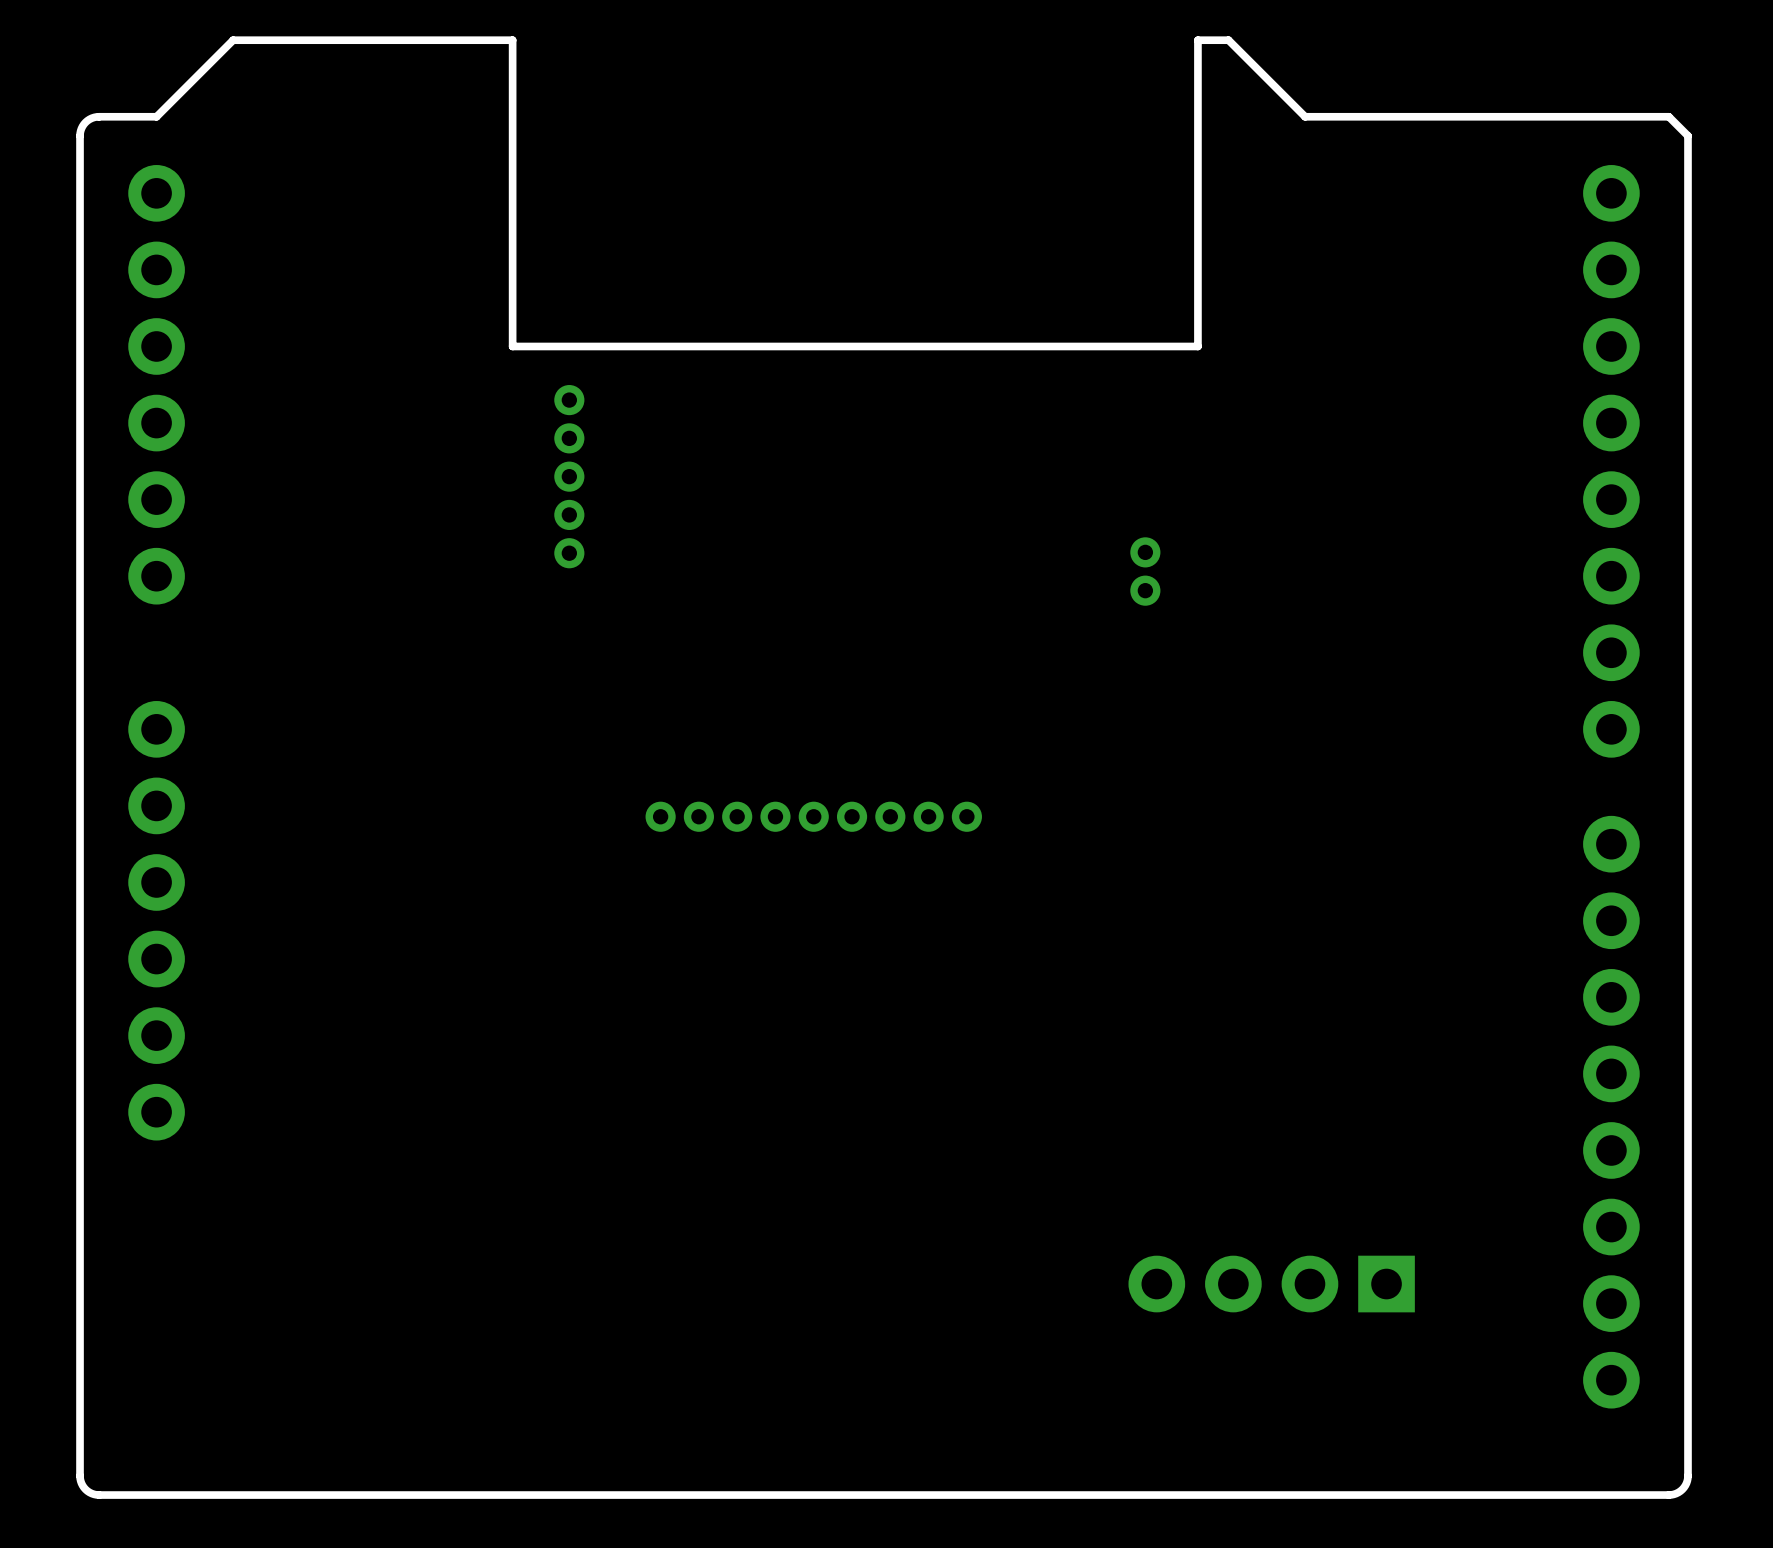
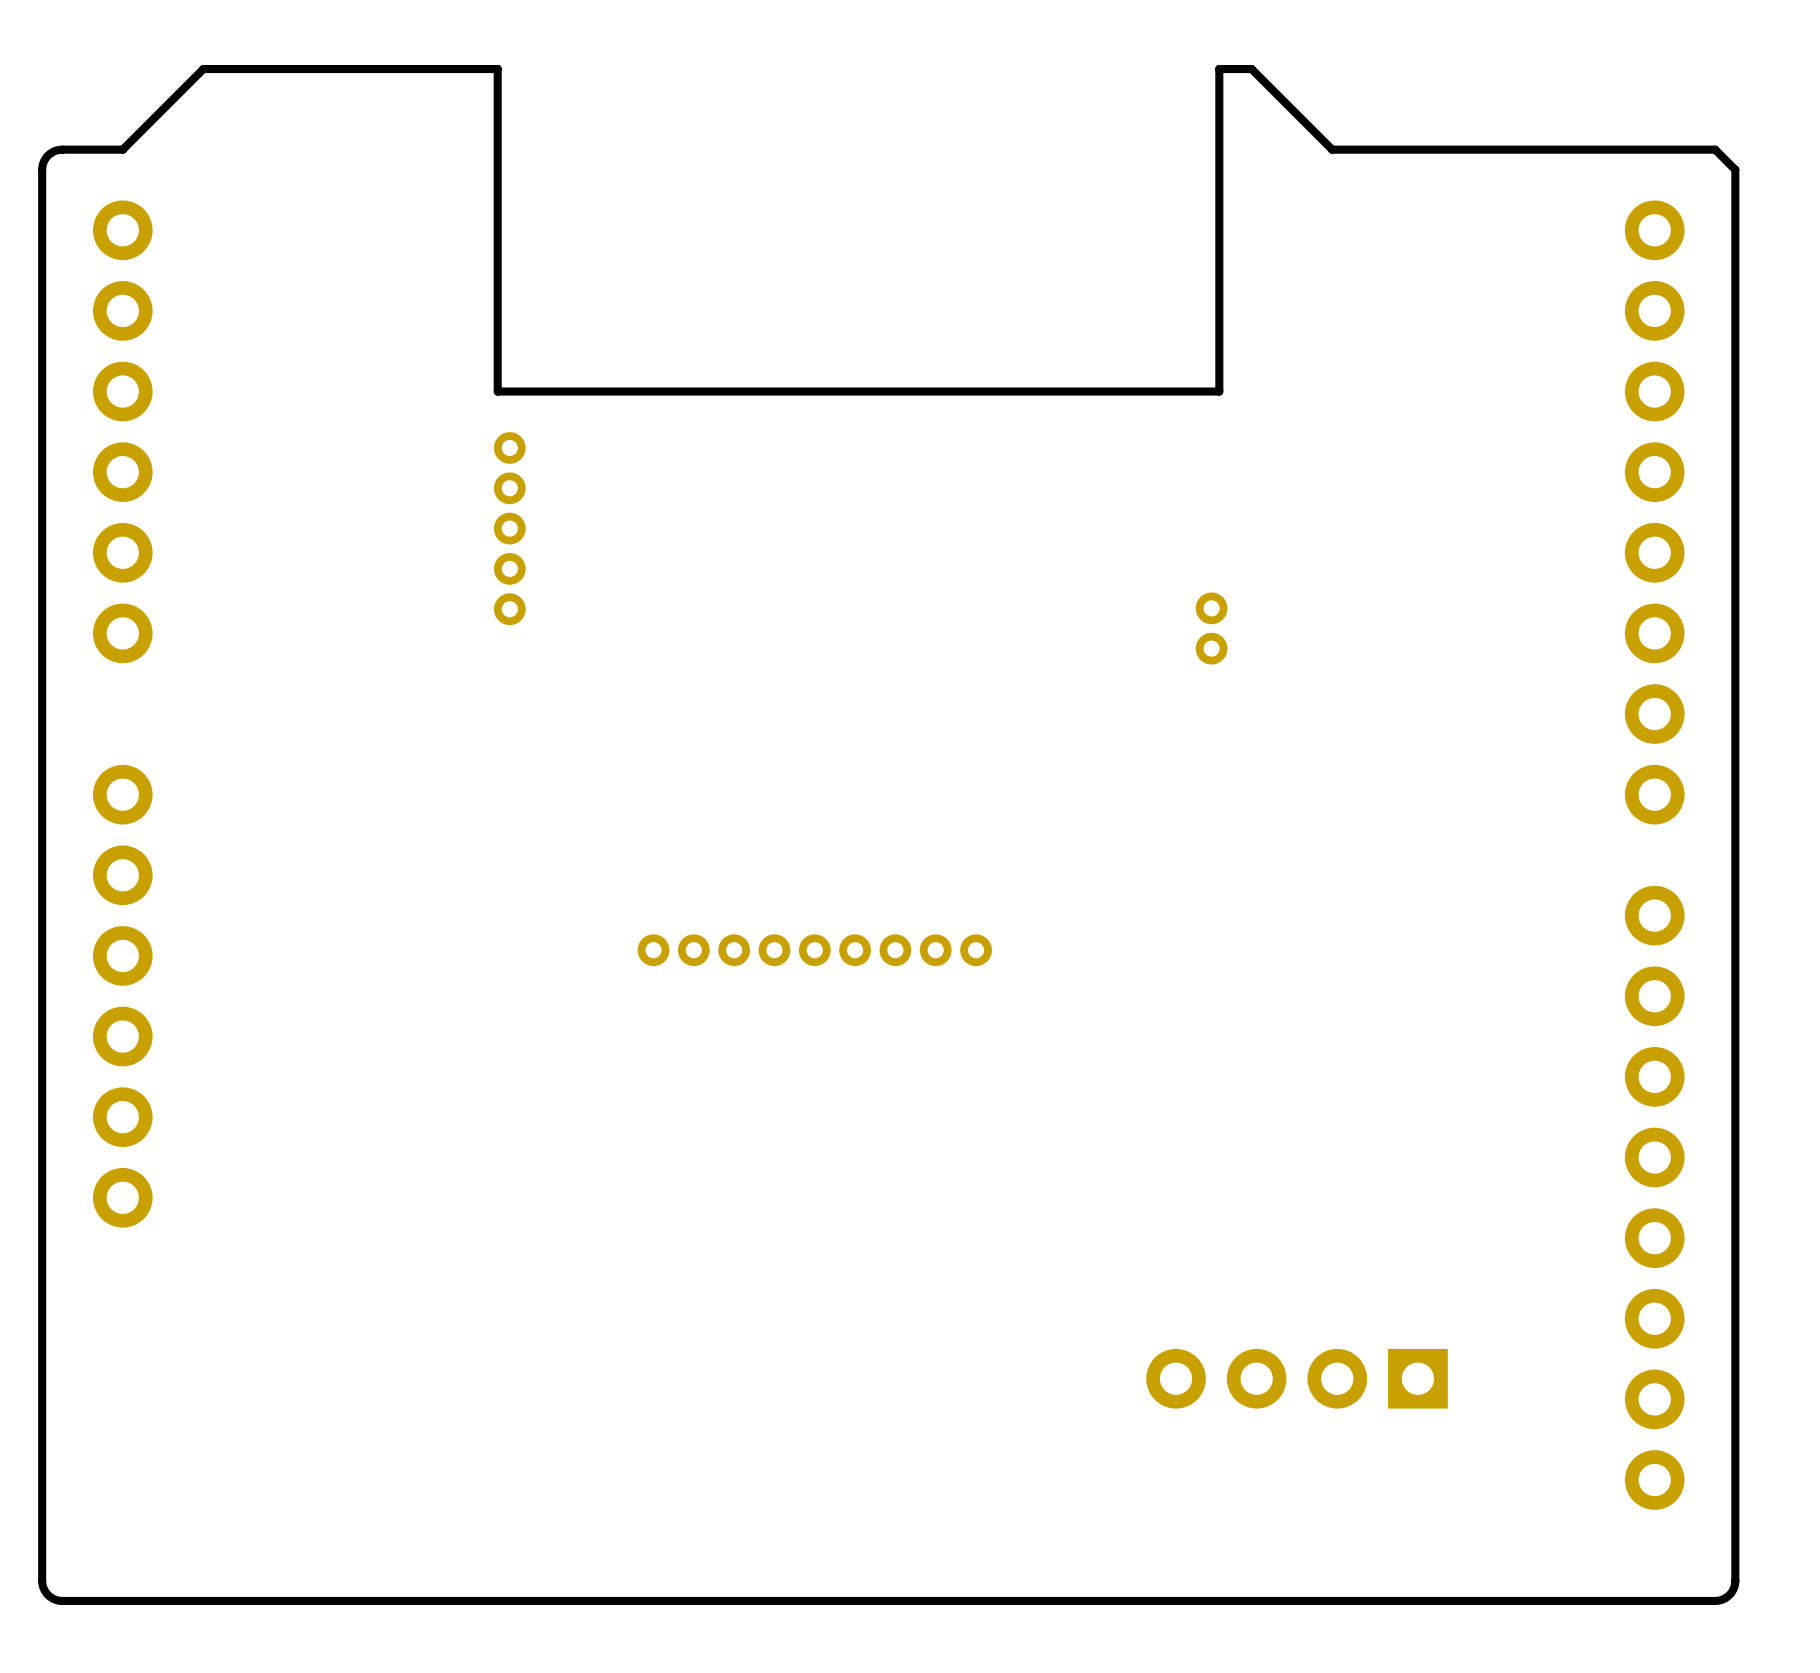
part position: (569, 476) -> (509, 528)
part position: (1145, 571) -> (1211, 628)
part position: (718, 816) -> (714, 950)
part position: (890, 816) -> (895, 950)

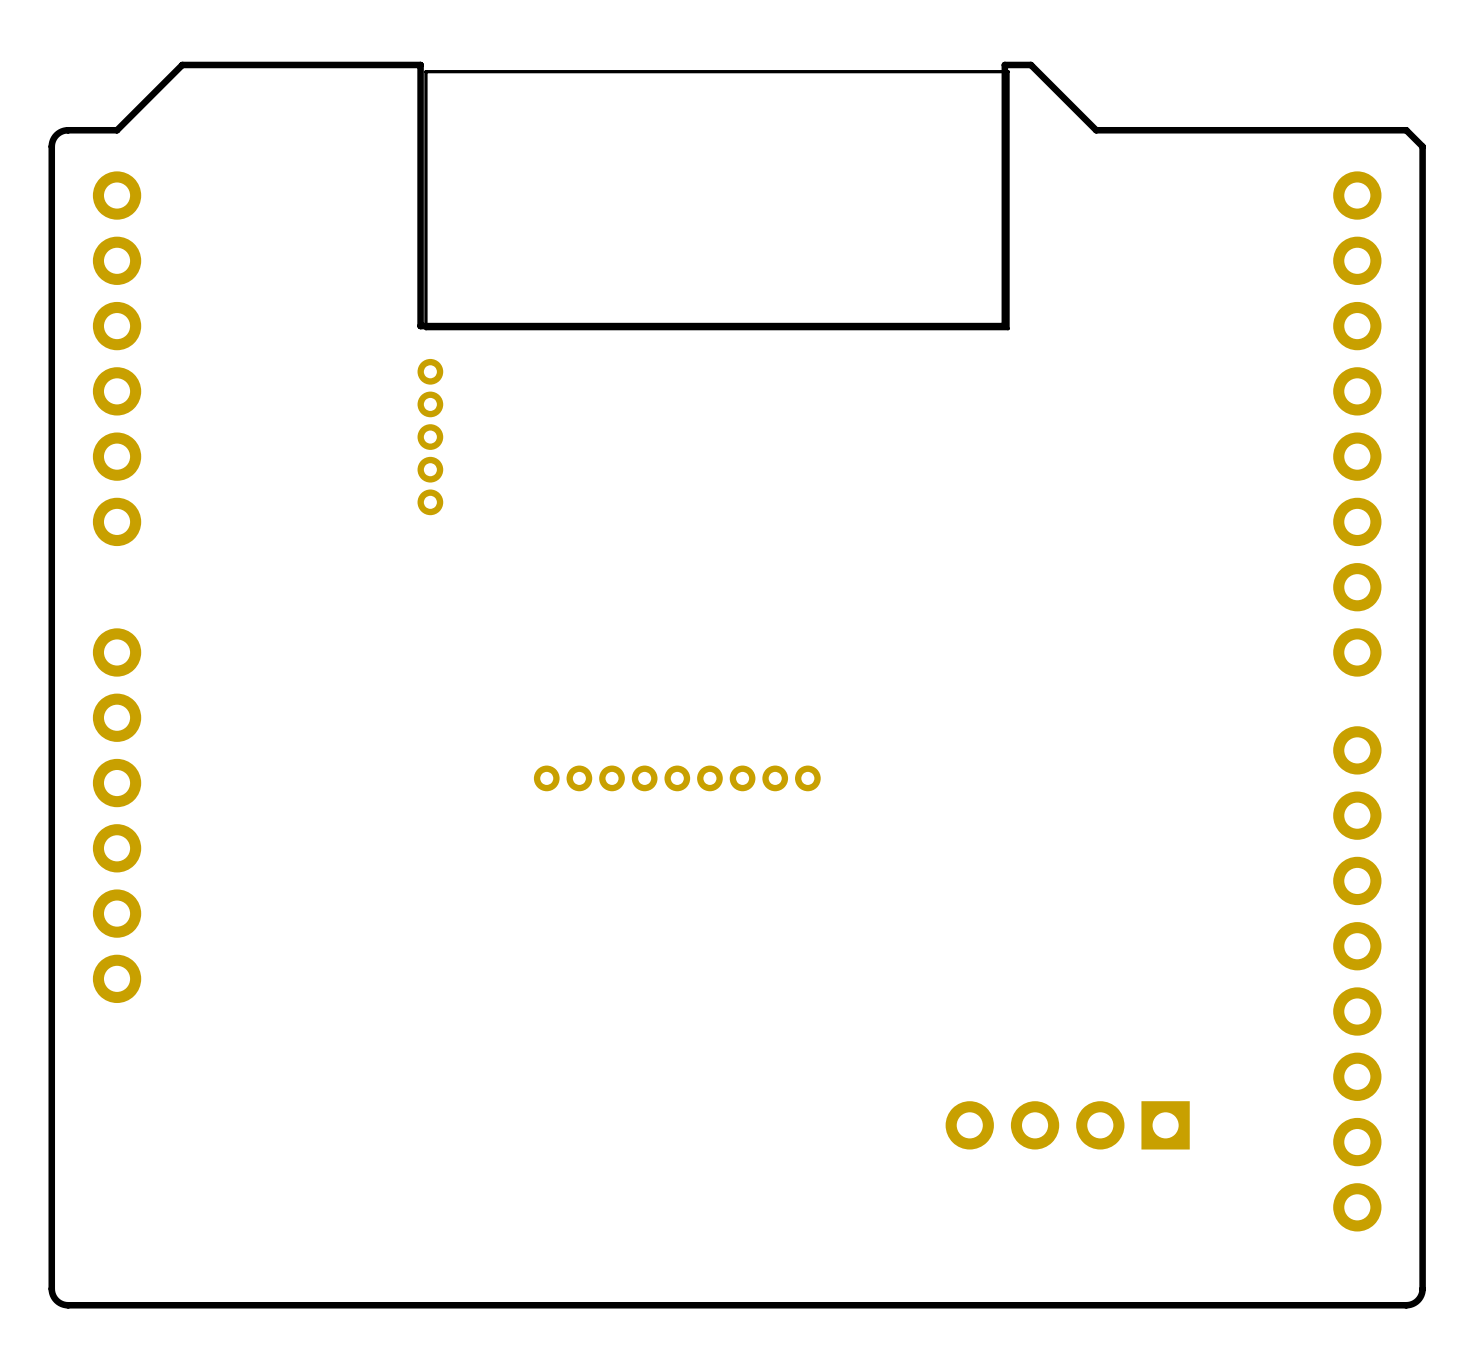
part: none -> (717, 200)
part: (1211, 628) -> none

